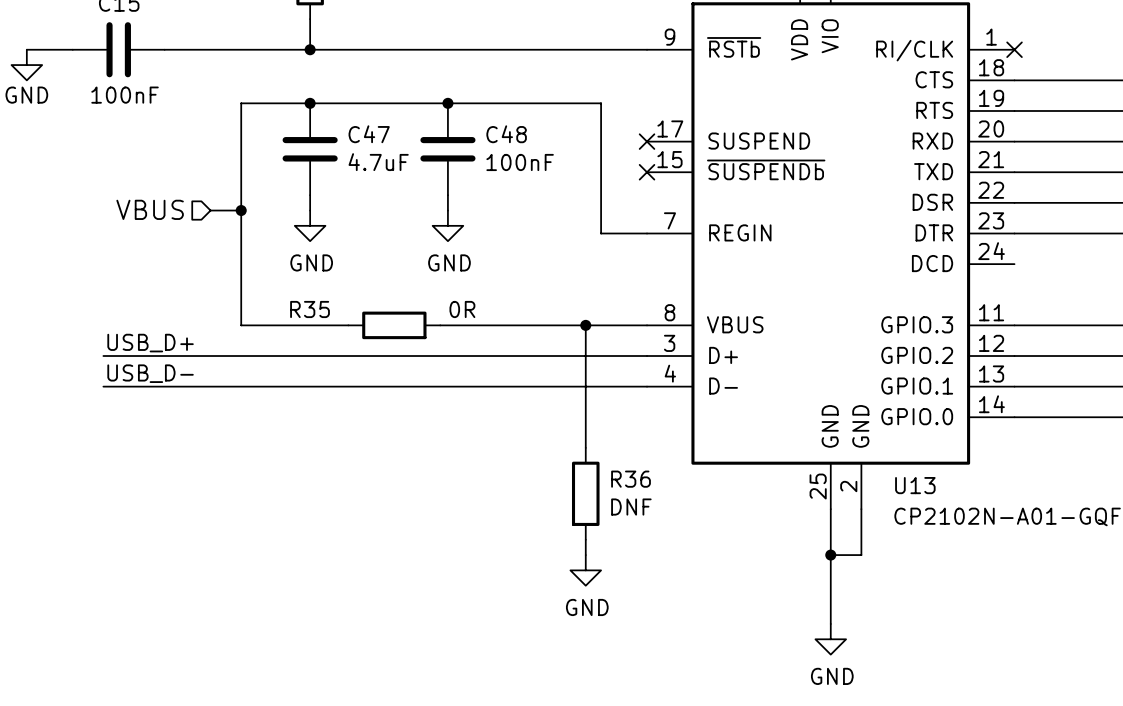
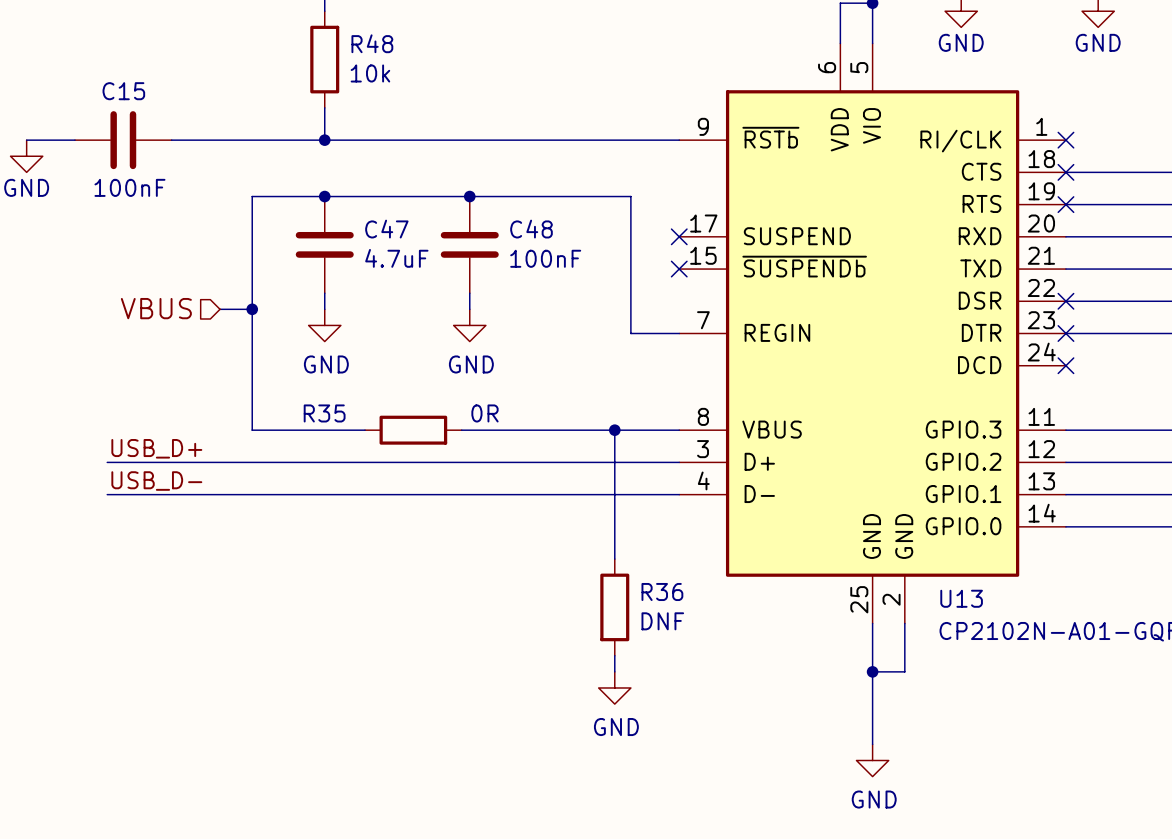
no-connect mark: none -> (1065, 172)
no-connect mark: none -> (1065, 204)
no-connect mark: none -> (1065, 301)
no-connect mark: none -> (1065, 333)
no-connect mark: none -> (1065, 365)

